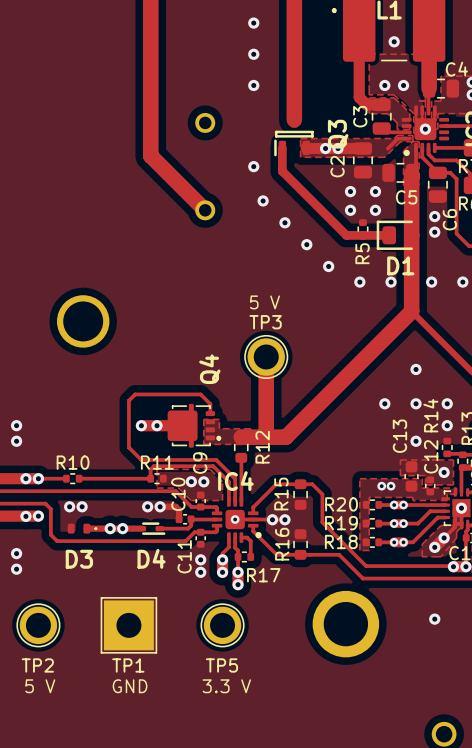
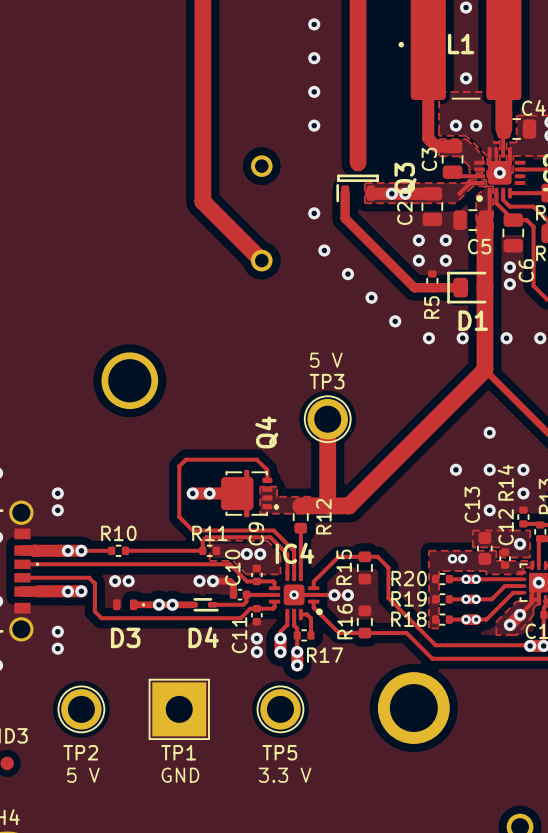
via: (434, 619) -> none

